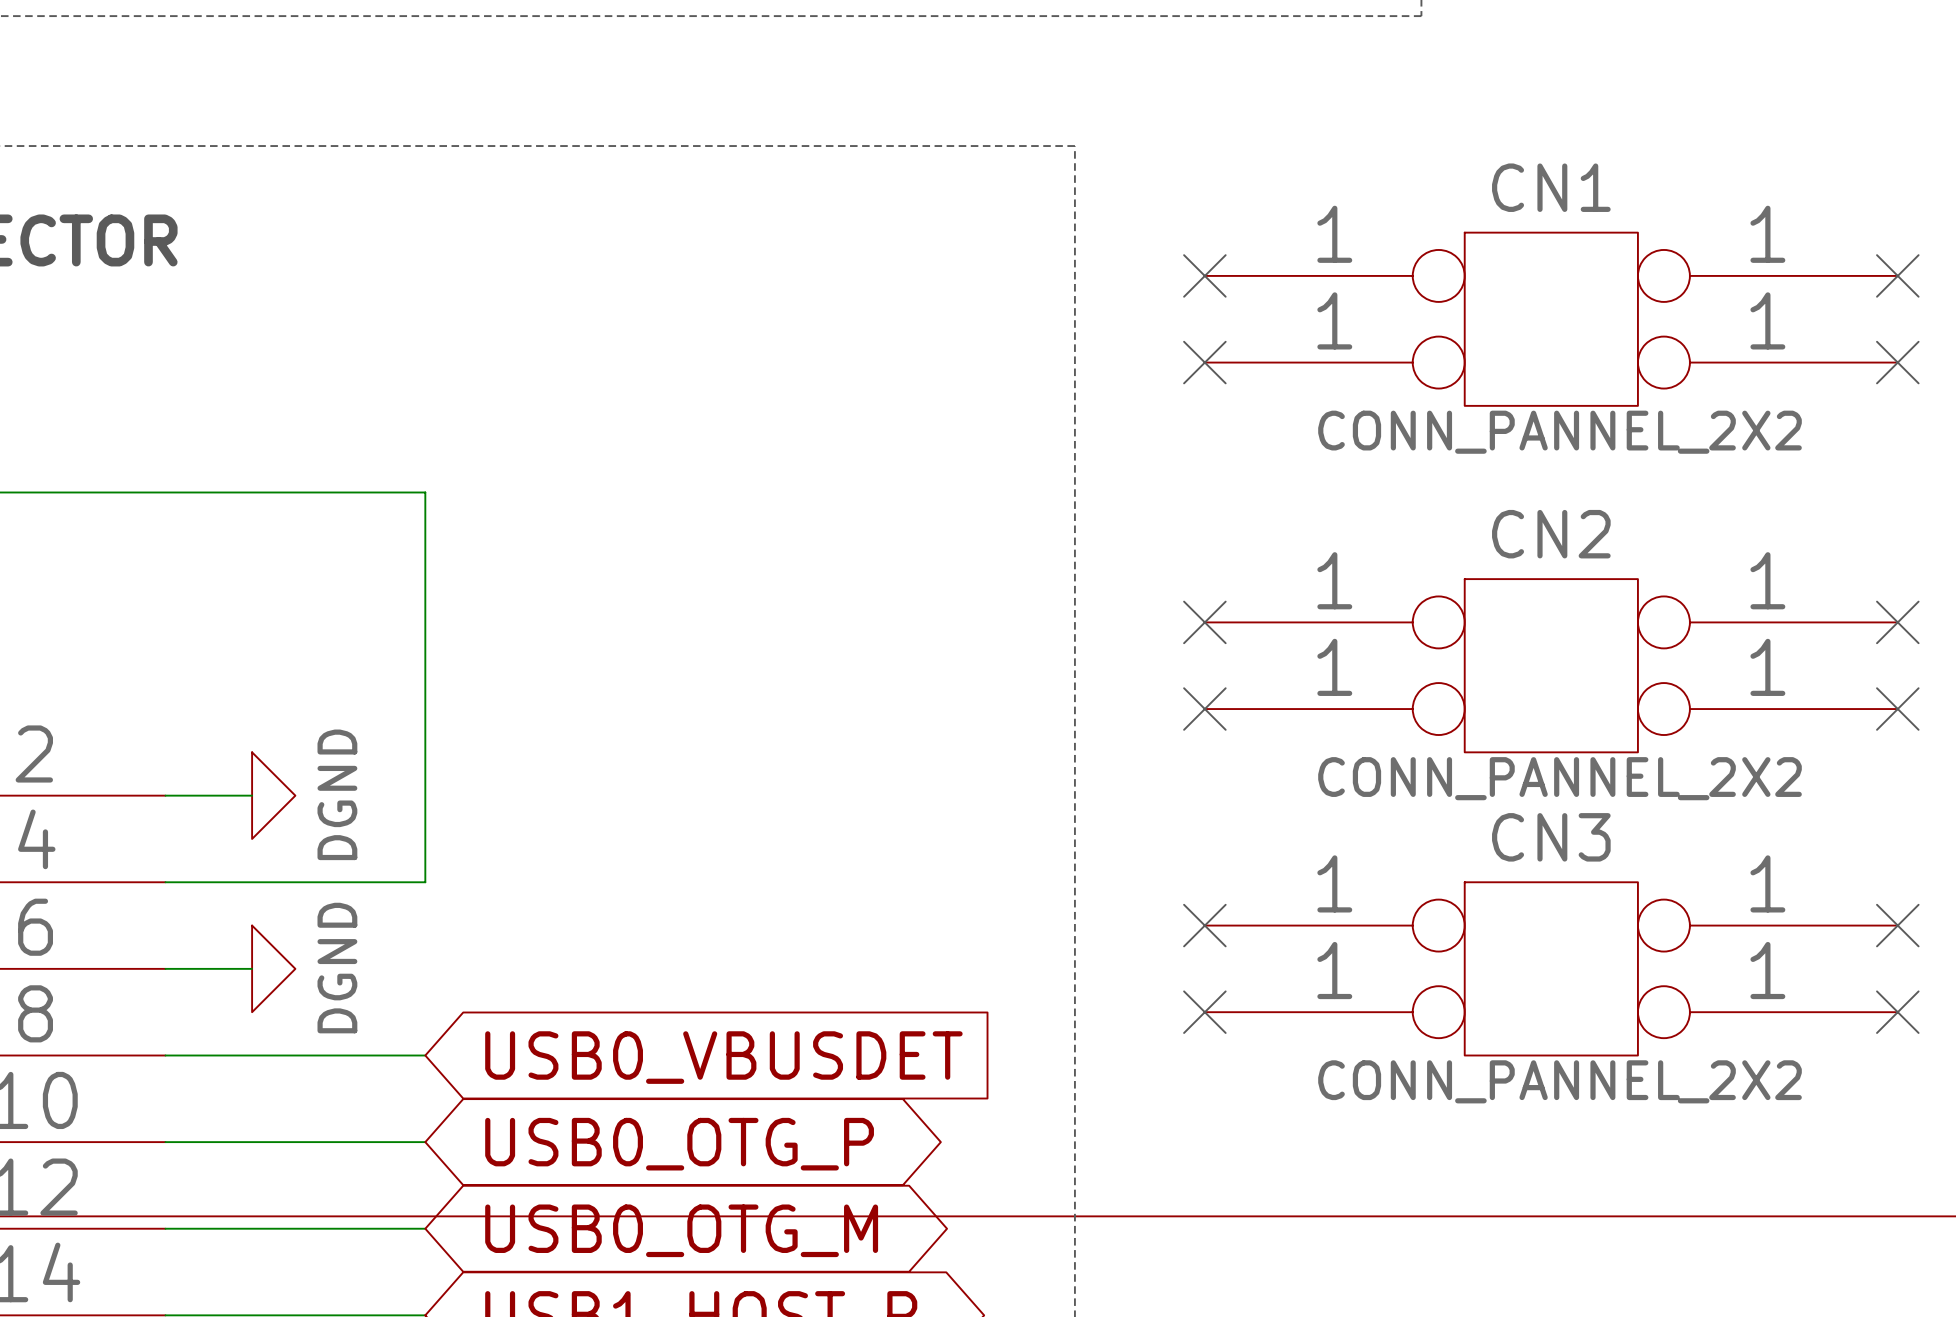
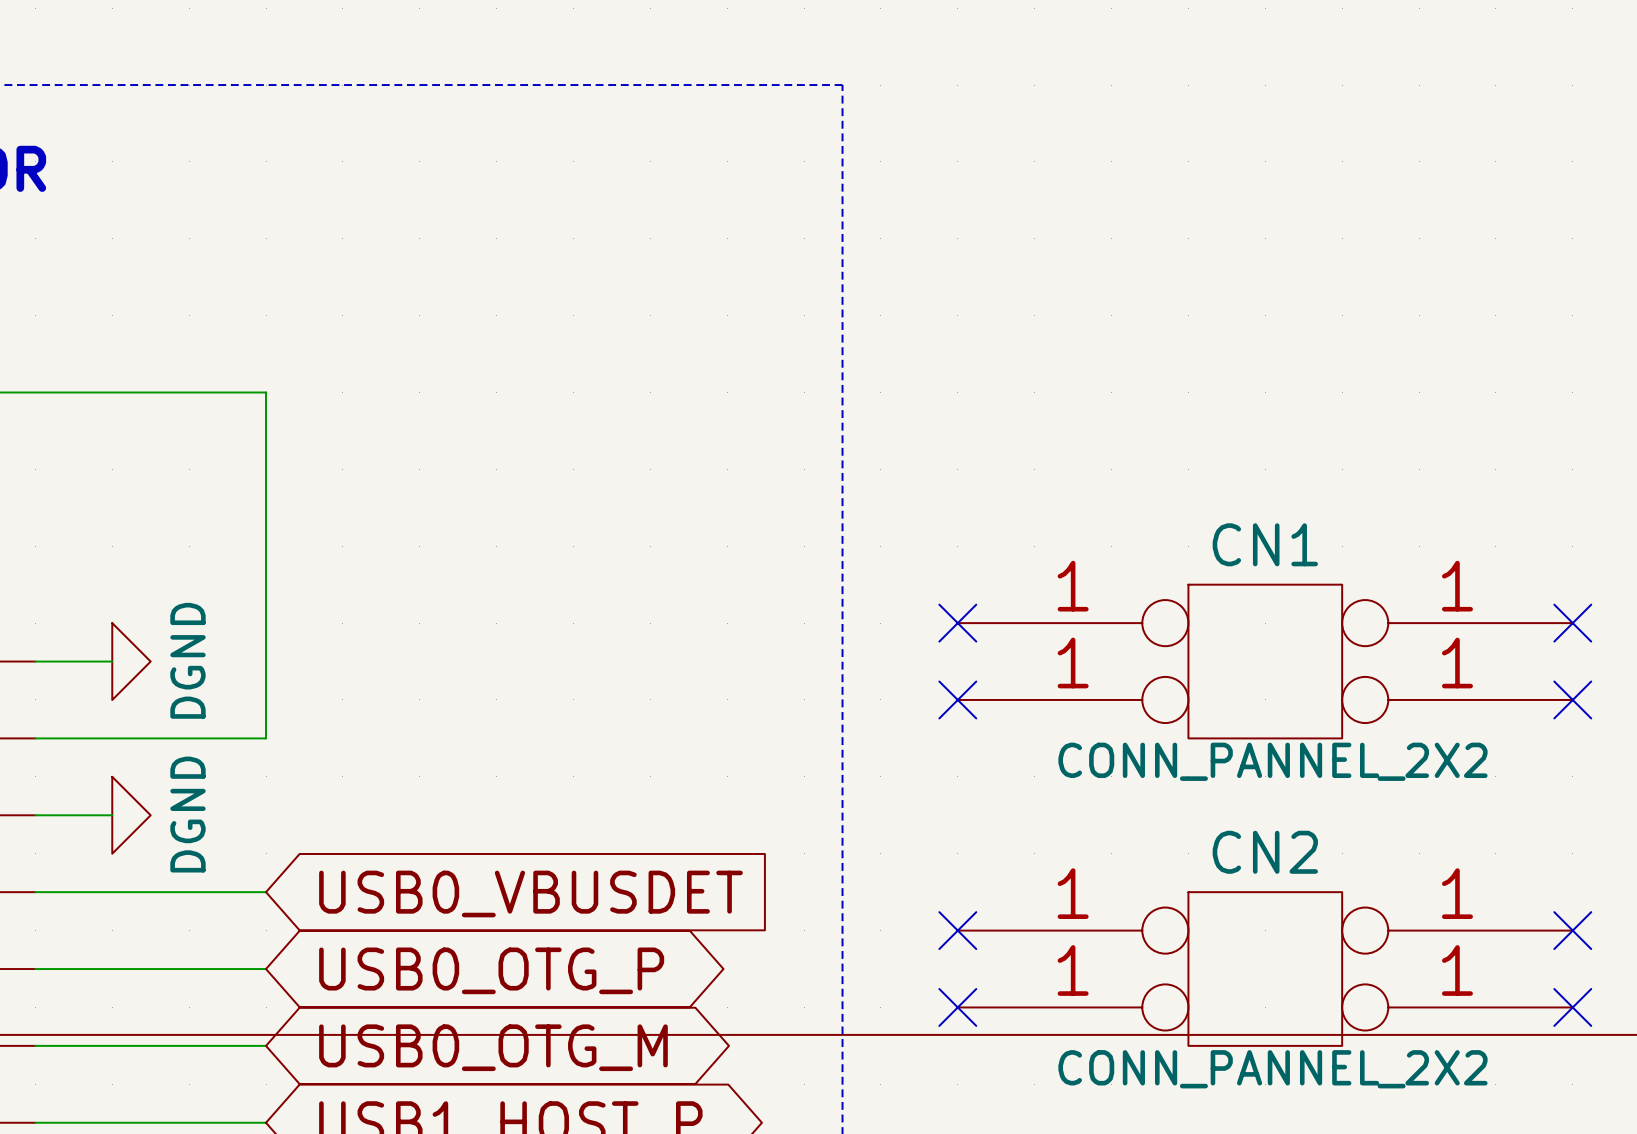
no-connect mark: (1204, 275) -> none
no-connect mark: (1897, 275) -> none
CN1 position: (1551, 319) -> (1265, 661)
no-connect mark: (1204, 362) -> none
no-connect mark: (1897, 362) -> none
no-connect mark: (1204, 622) -> none
no-connect mark: (1897, 622) -> none
CN2 position: (1551, 665) -> (1265, 969)
no-connect mark position: (1204, 709) -> (957, 623)
no-connect mark position: (1897, 709) -> (1572, 623)
no-connect mark: none -> (957, 699)
no-connect mark: none -> (1572, 699)
no-connect mark: (1204, 925) -> none
no-connect mark: (1897, 925) -> none
CN3: CONN_PANNEL_2X2 (1551, 968) -> none
no-connect mark: (1204, 1012) -> none
no-connect mark: (1897, 1012) -> none
no-connect mark: none -> (957, 930)
no-connect mark: none -> (1572, 930)
no-connect mark: none -> (957, 1007)
no-connect mark: none -> (1572, 1007)

